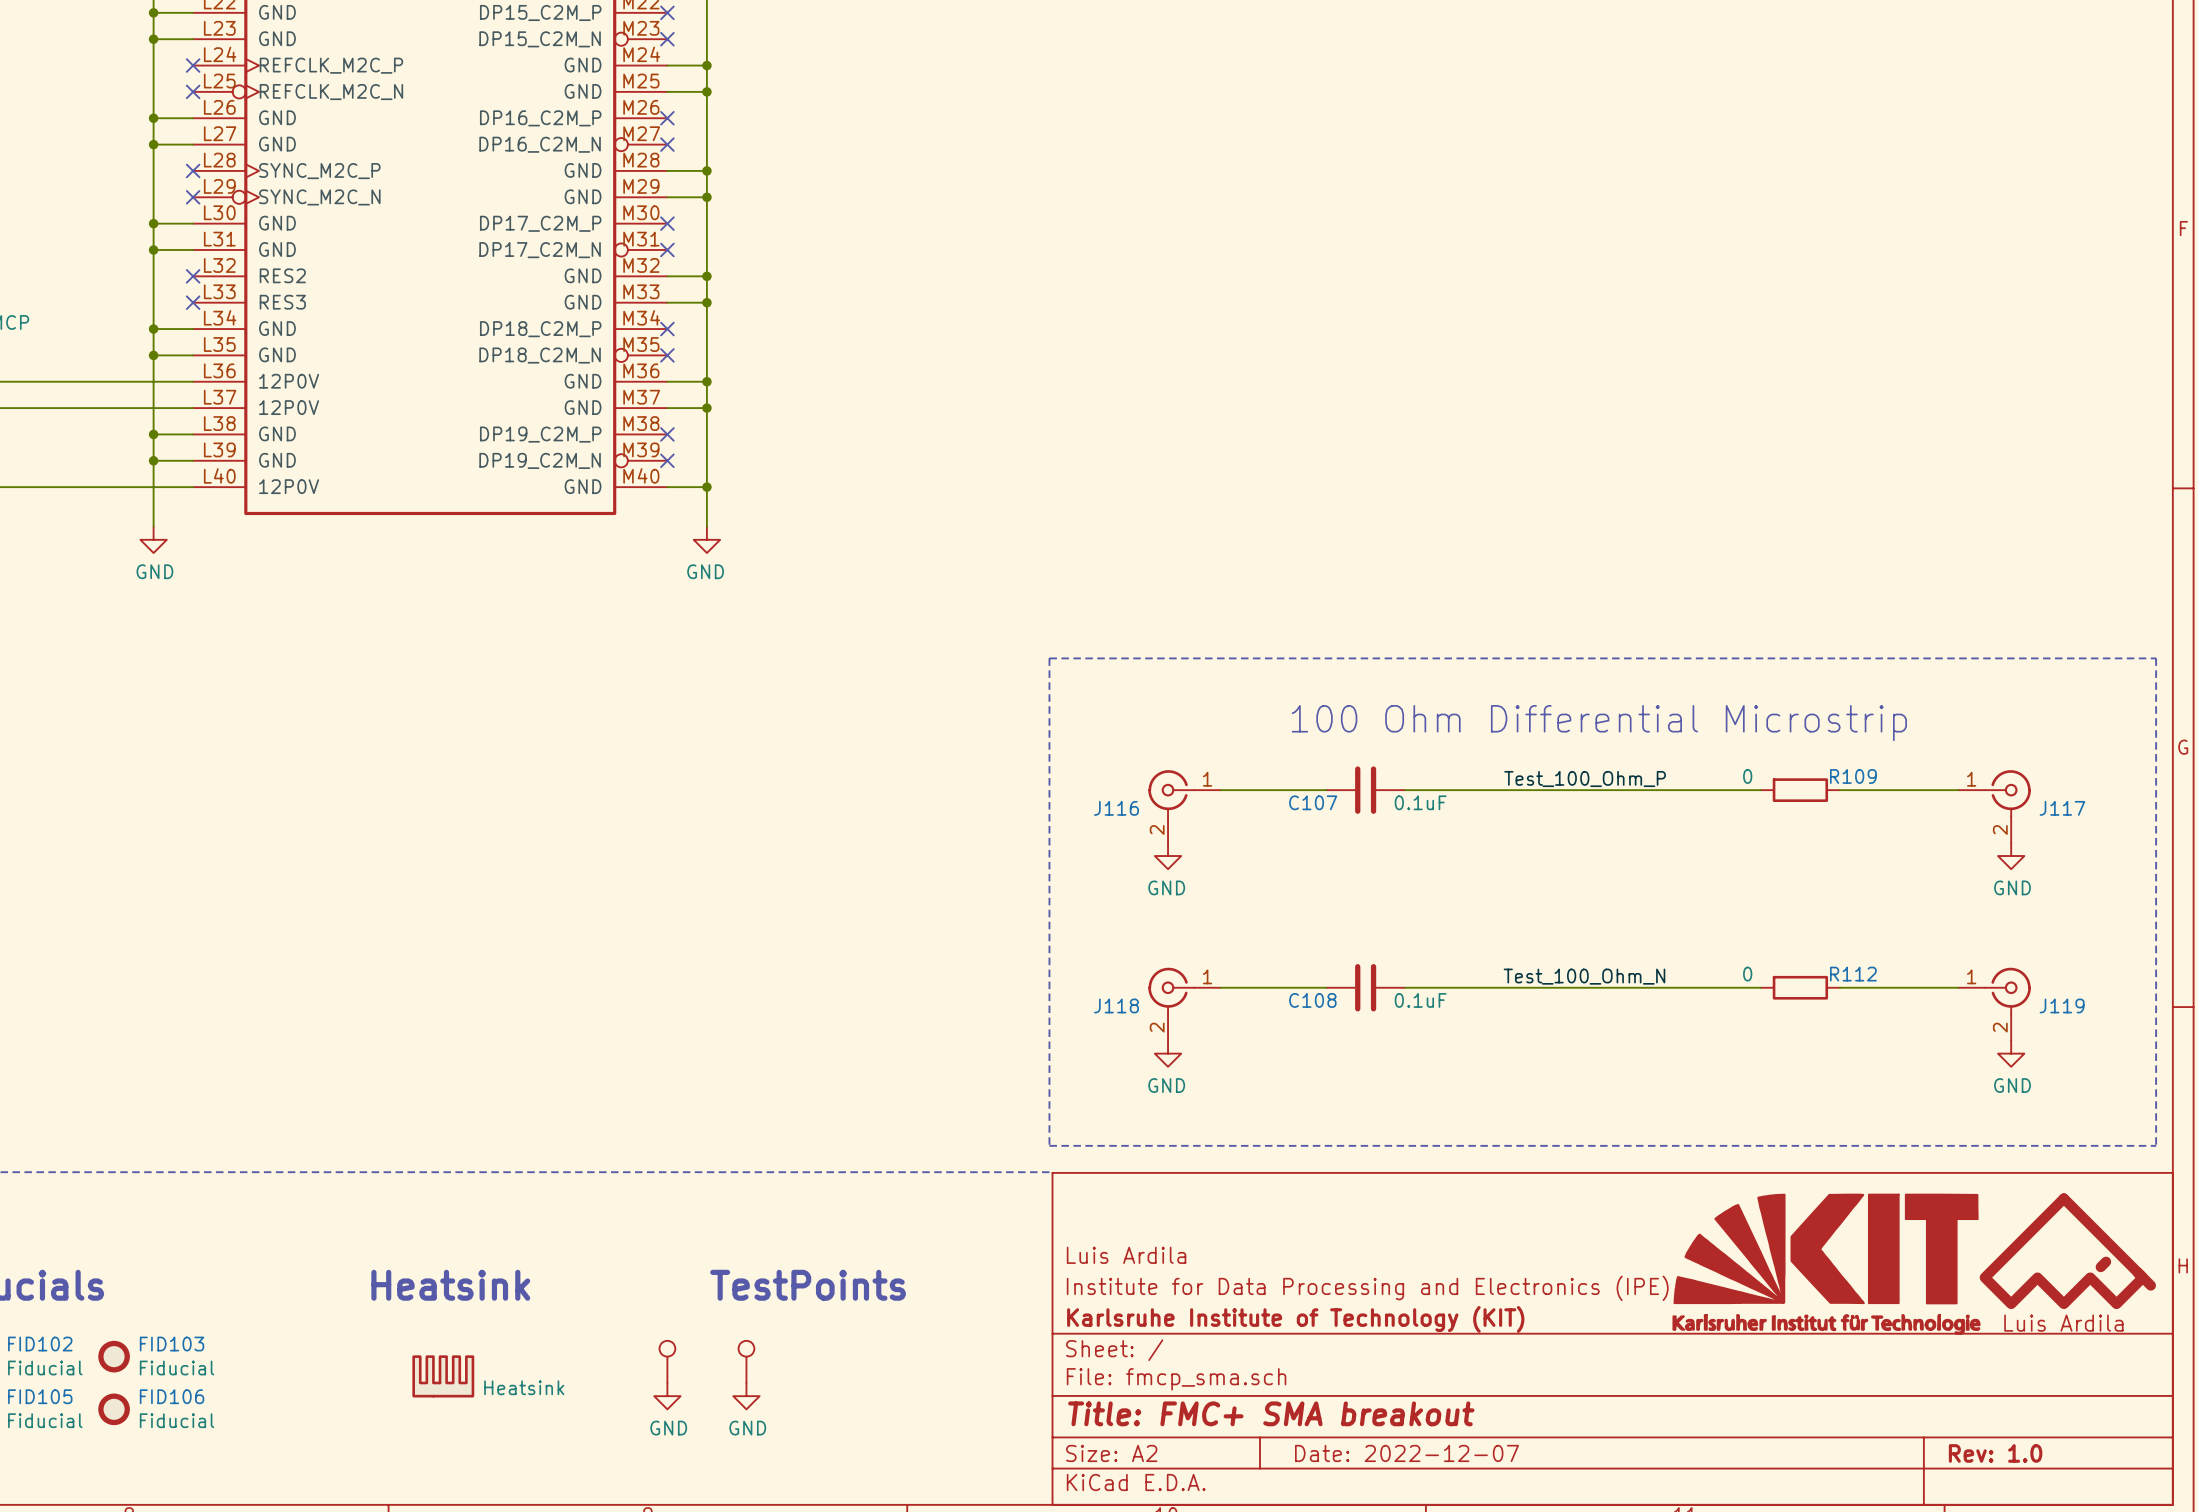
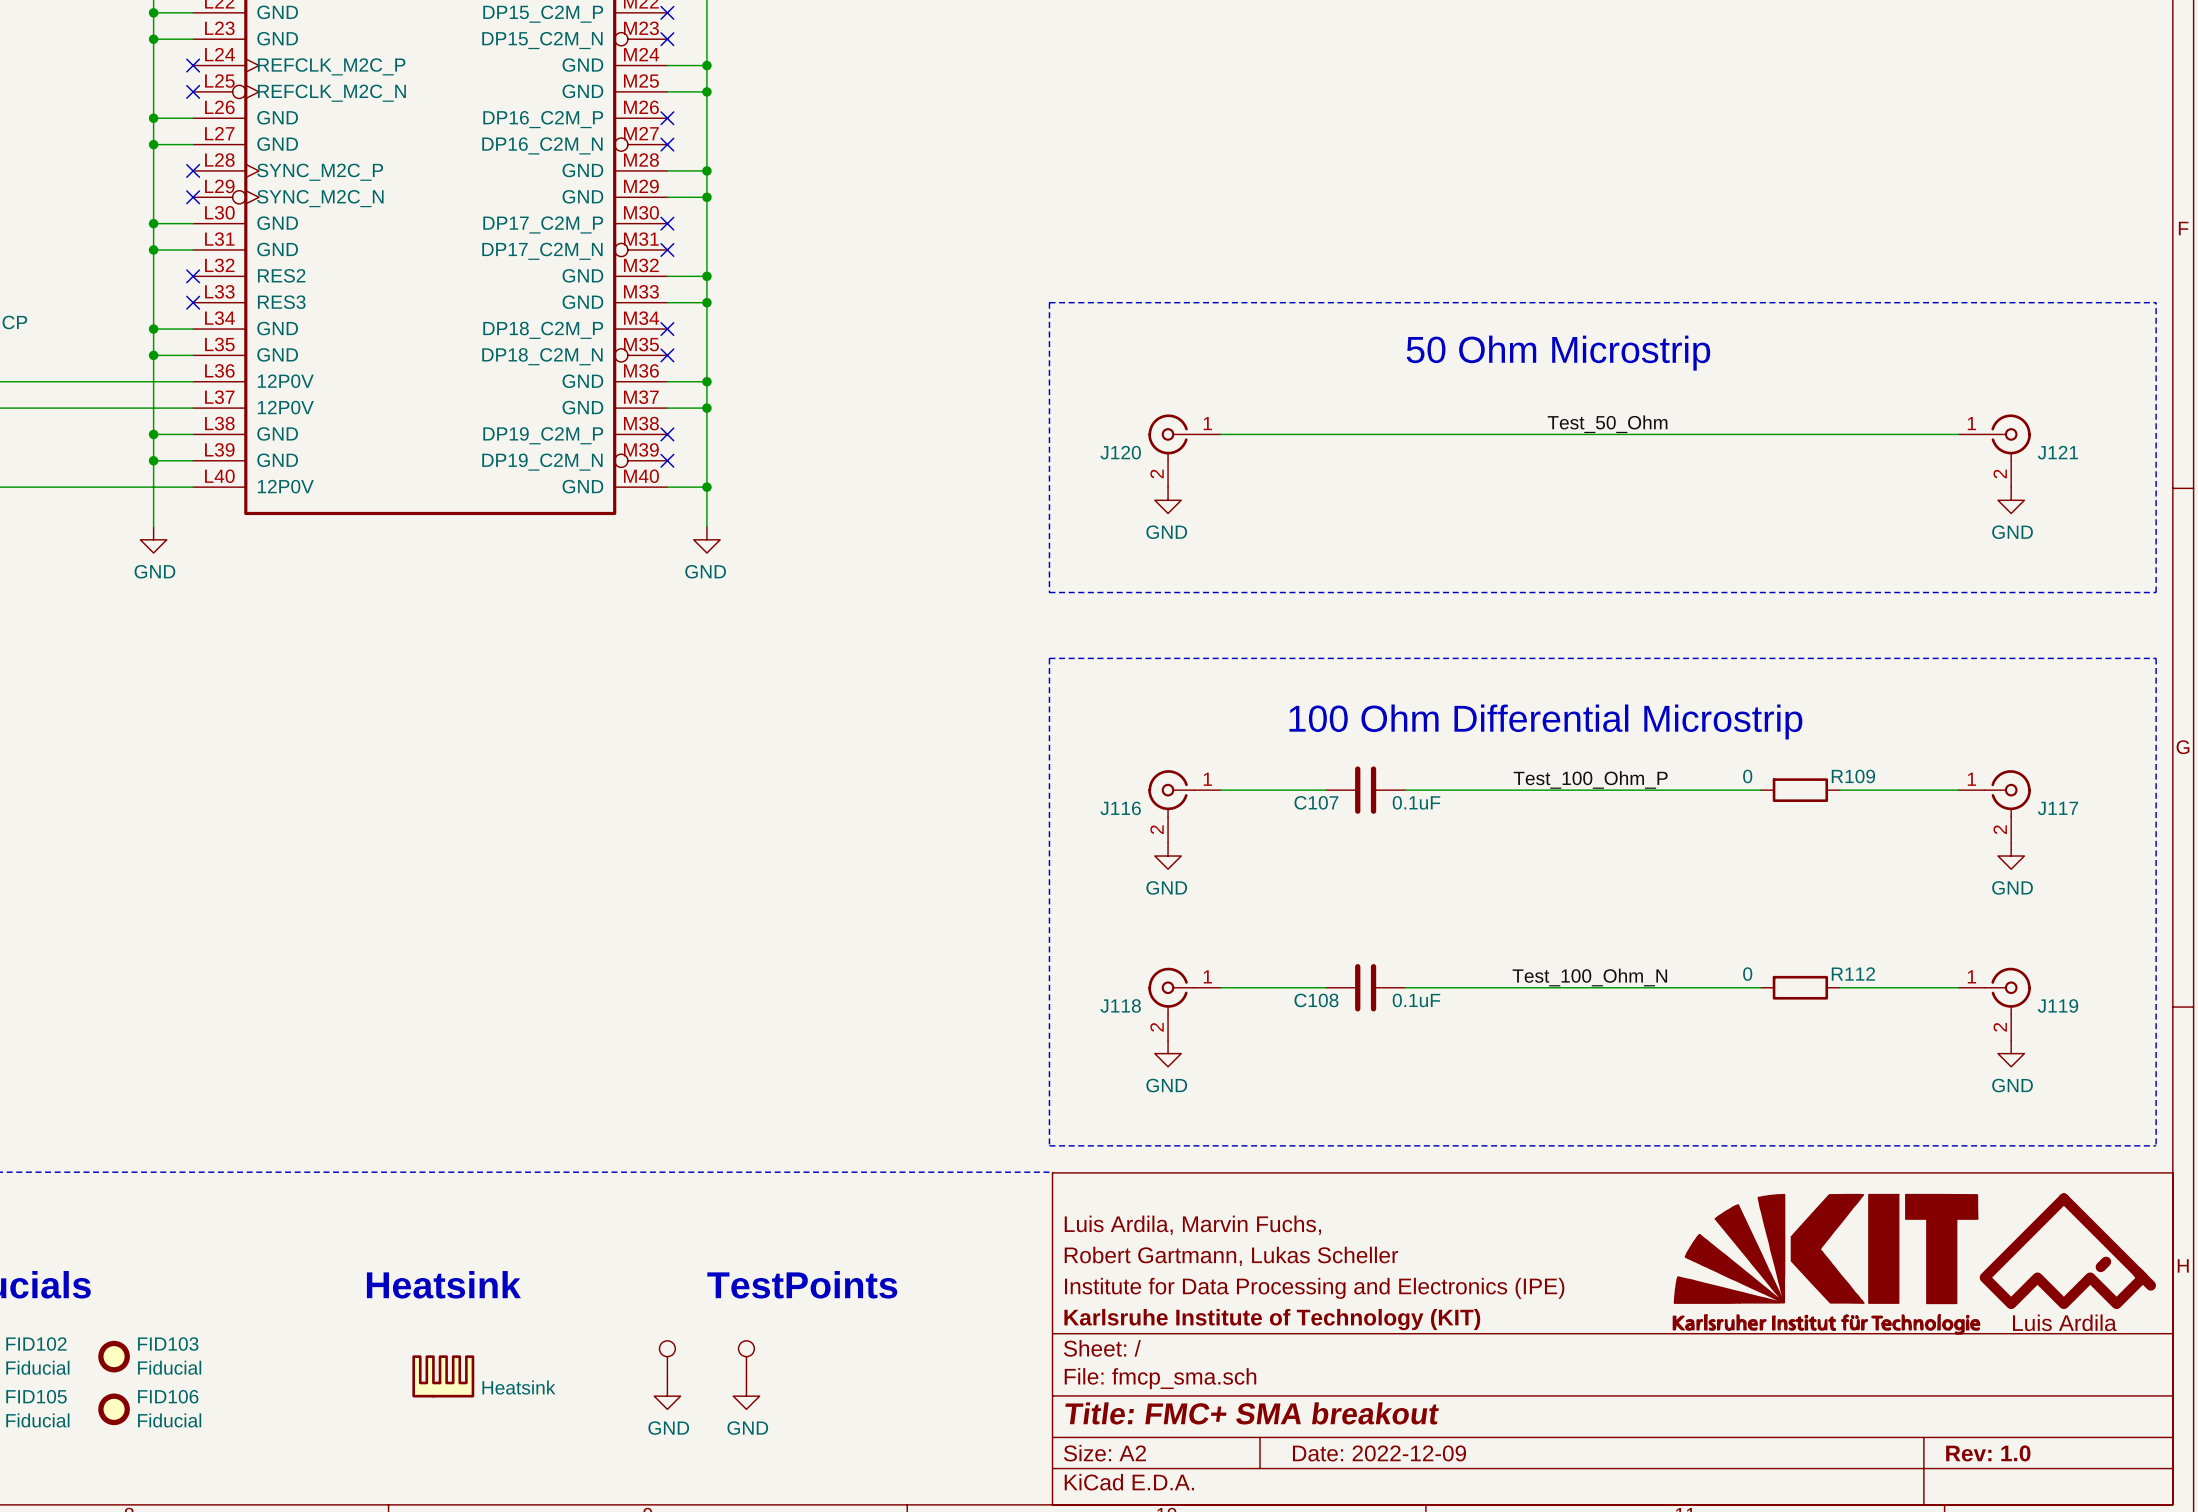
line: none -> (1049, 302) (2156, 302) (2156, 592) (1049, 592) (1049, 302)
text: none -> 50 Ohm Microstrip (1558, 353)
label: none -> Test_50_Ohm (1607, 424)
wire: none -> (1220, 434) (1958, 434)
J120: none -> (1184, 450)
J121: none -> (1994, 450)
power symbol: none -> GND (1168, 500)
power symbol: none -> GND (2011, 500)
title block: none -> Luis Ardila, Marvin Fuchs, (1192, 1225)
title block: Luis Ardila (1126, 1255) -> Robert Gartmann, Lukas Scheller (1231, 1256)
title block: Date: 2022-12-07 (1406, 1453) -> Date: 2022-12-09 (1379, 1453)

